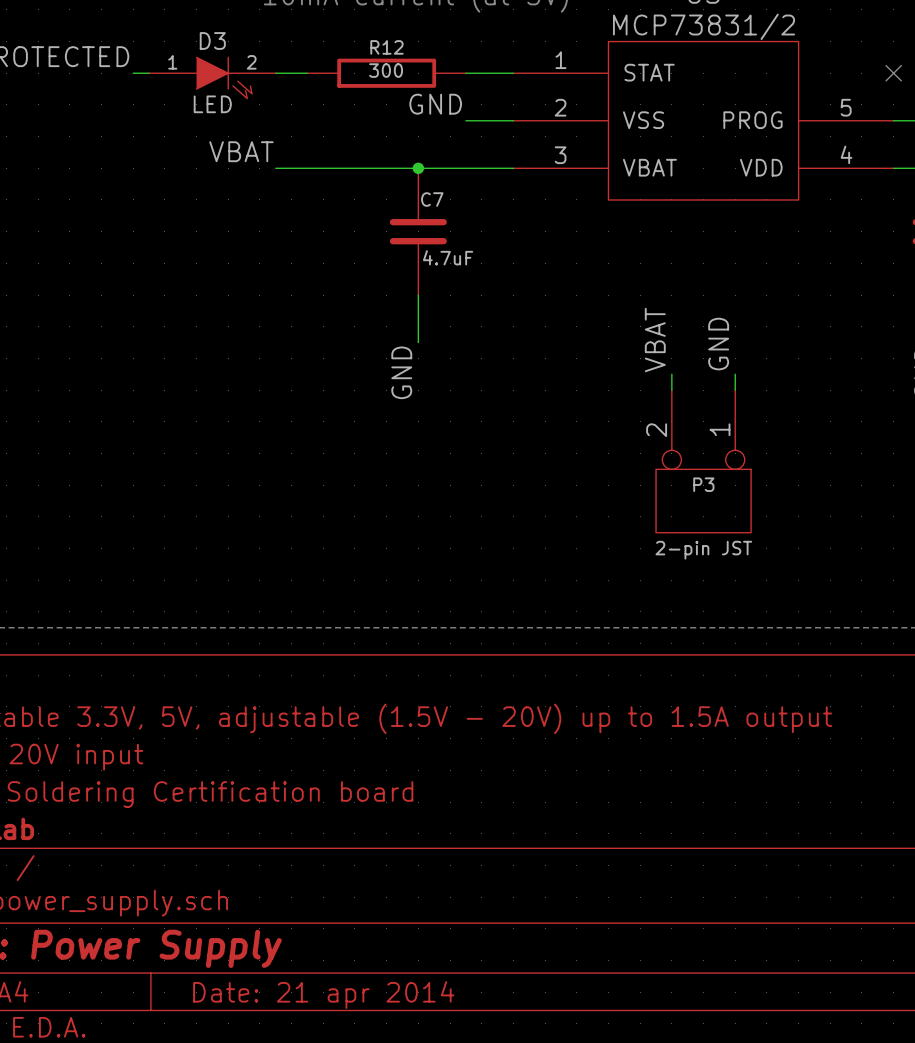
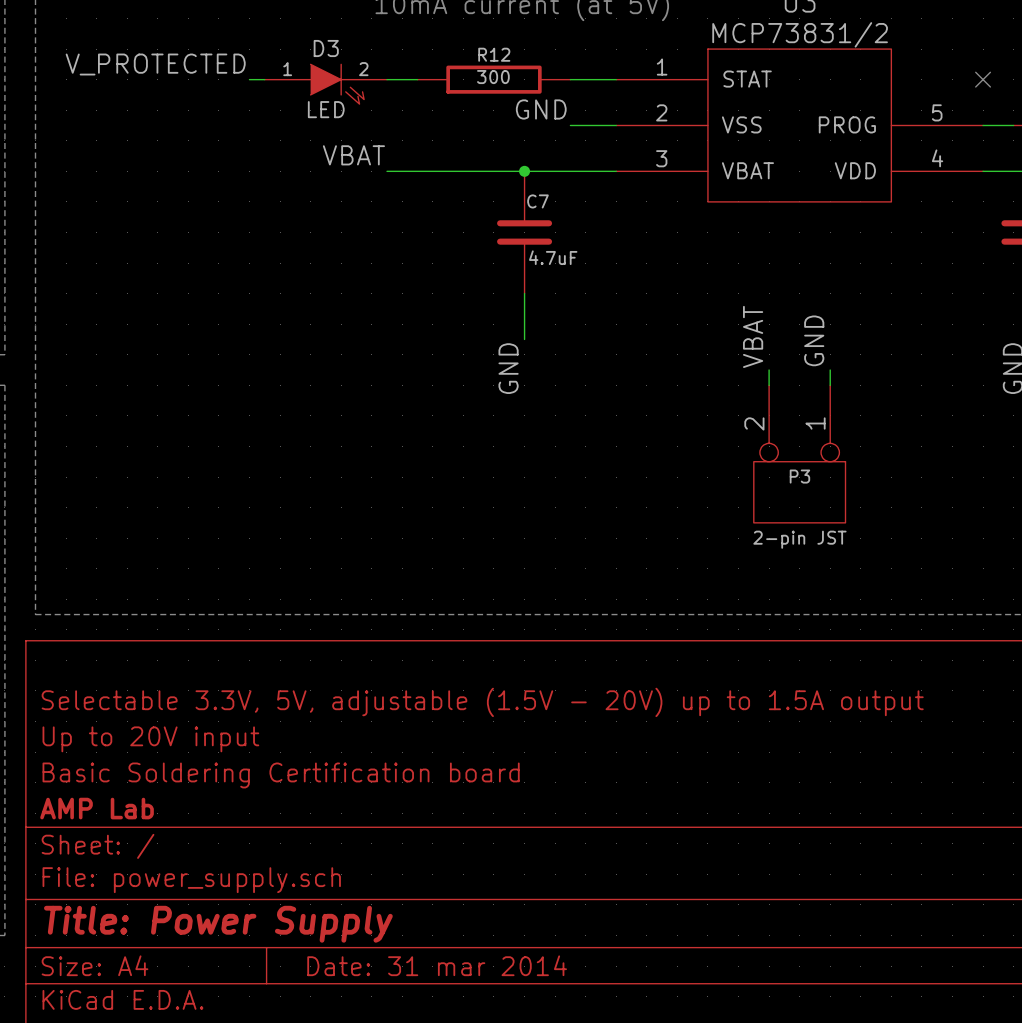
title block: Date: 21 apr 2014 (323, 994) -> Date: 31 mar 2014 (437, 965)

